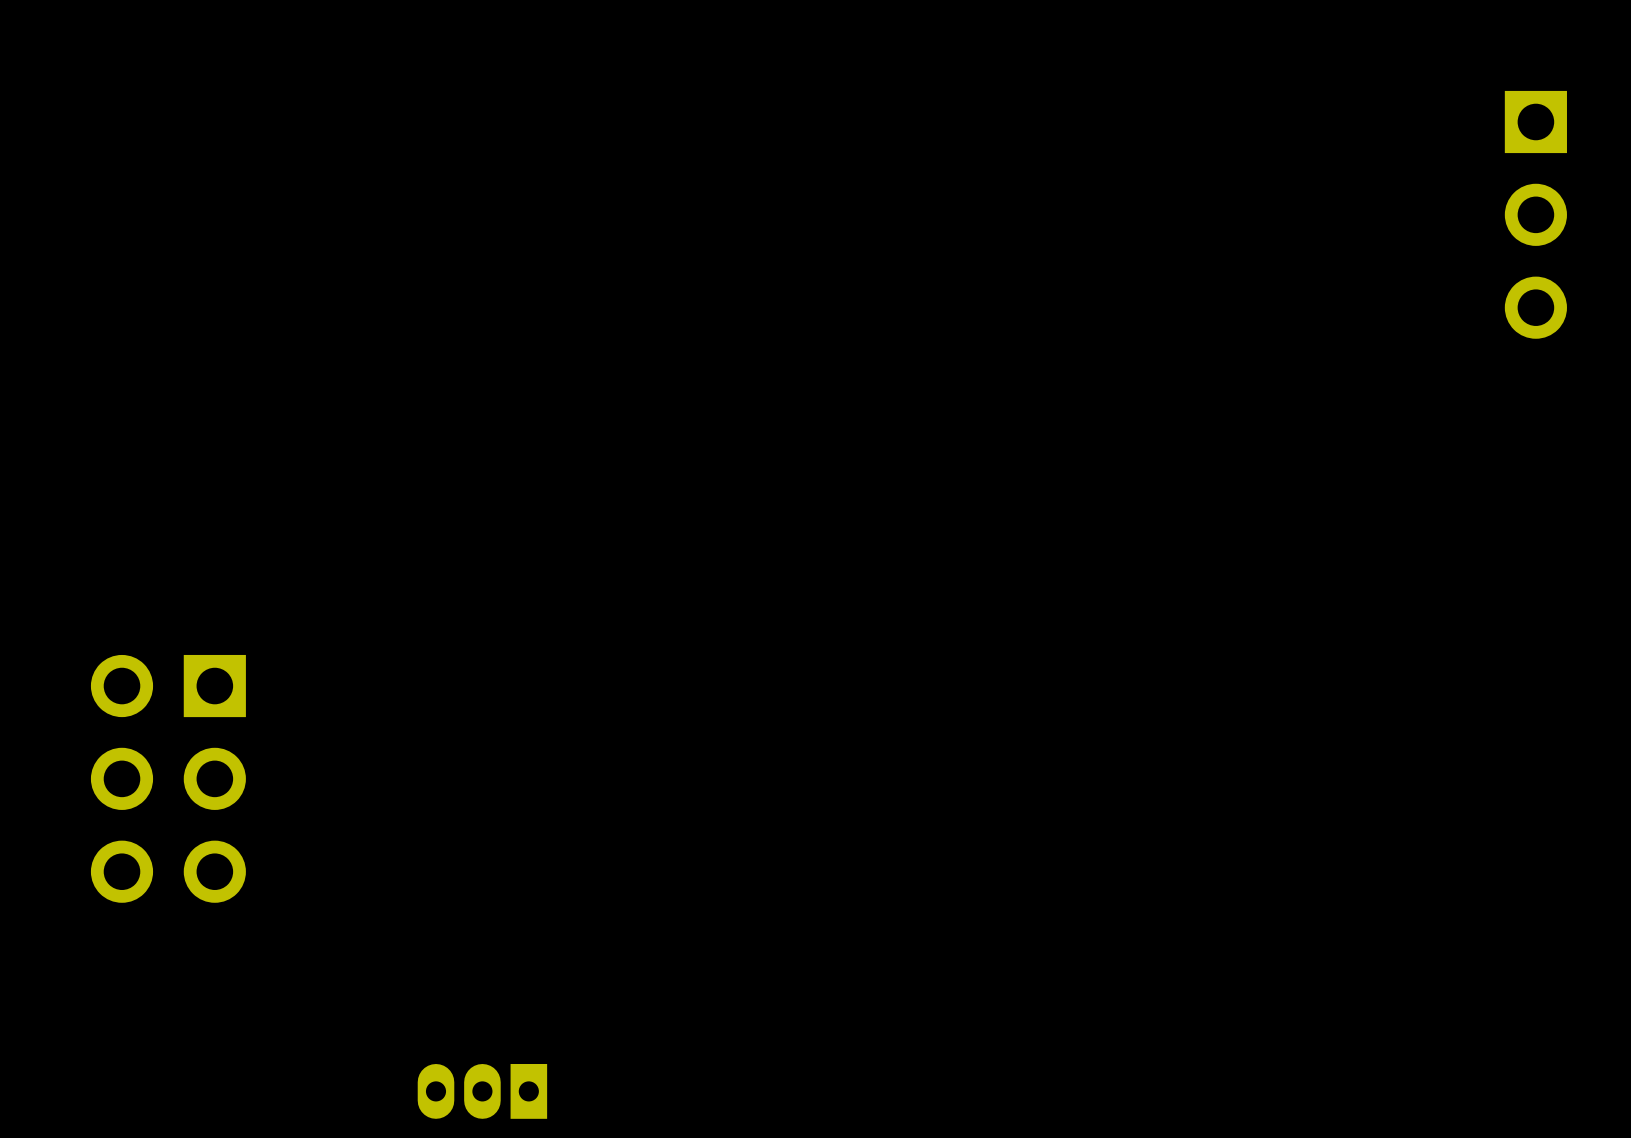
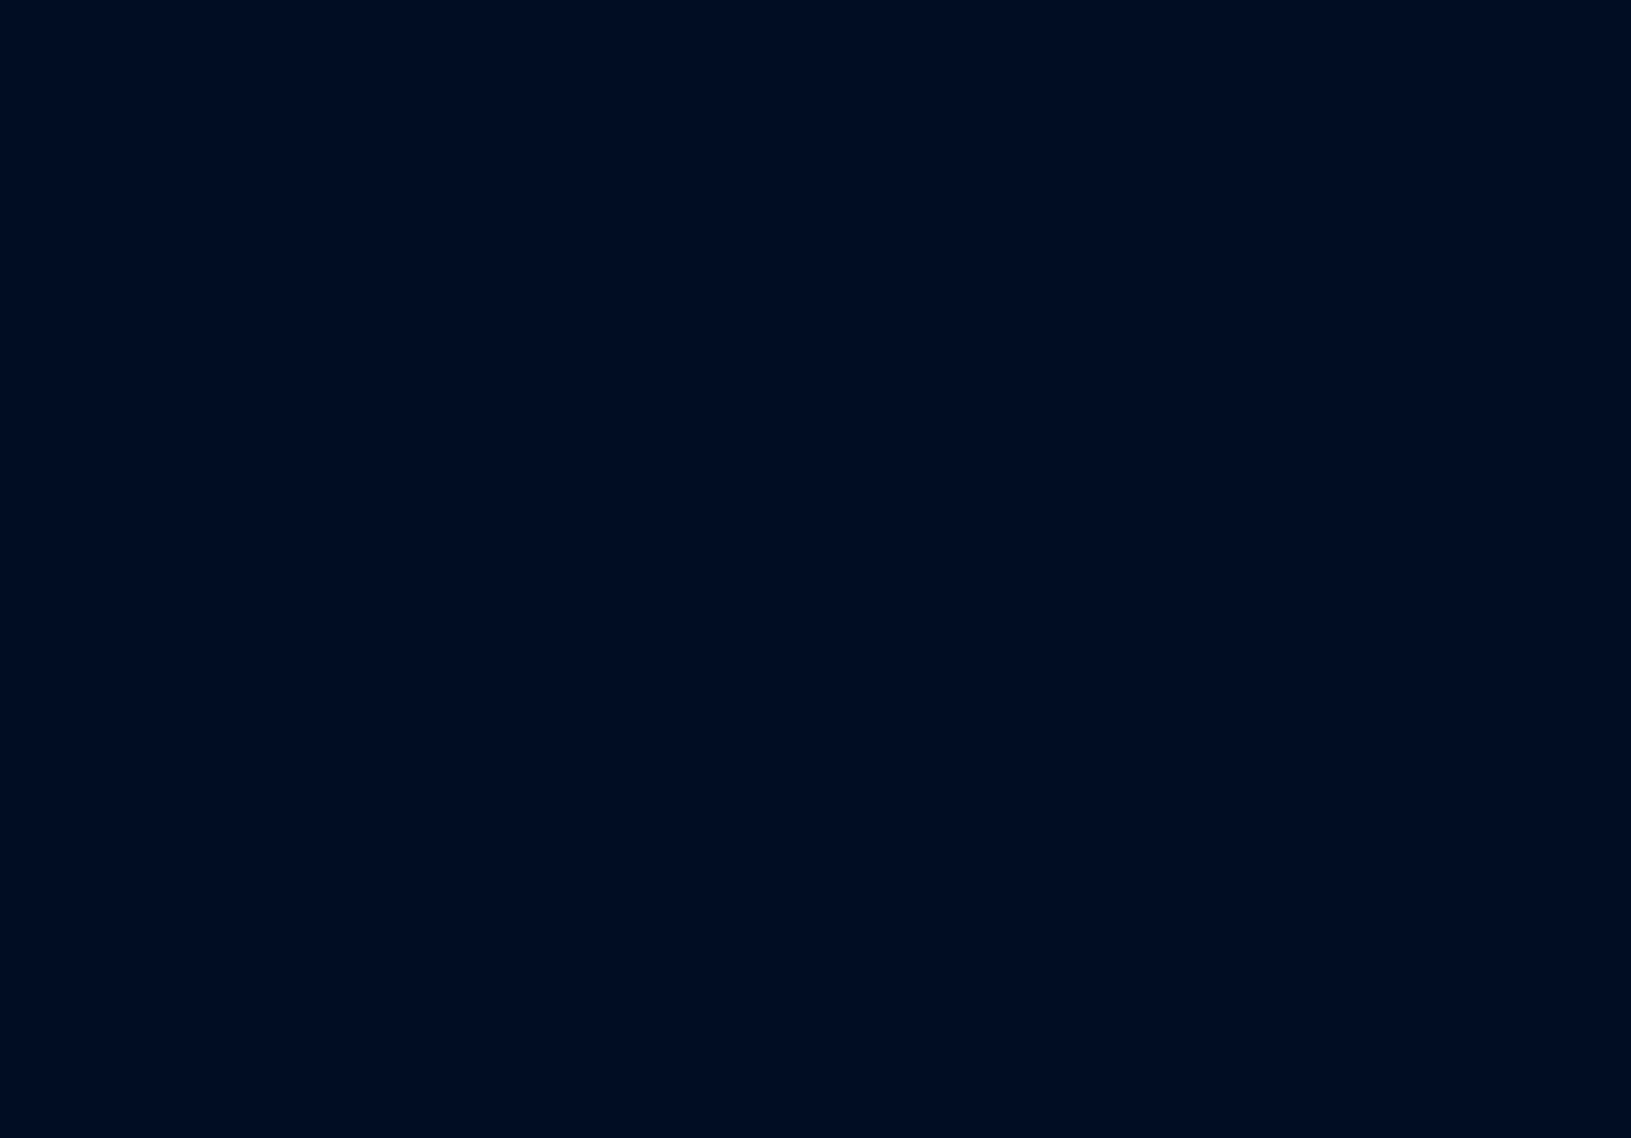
part: (1535, 214) -> none
part: (168, 778) -> none
part: (482, 1091) -> none

